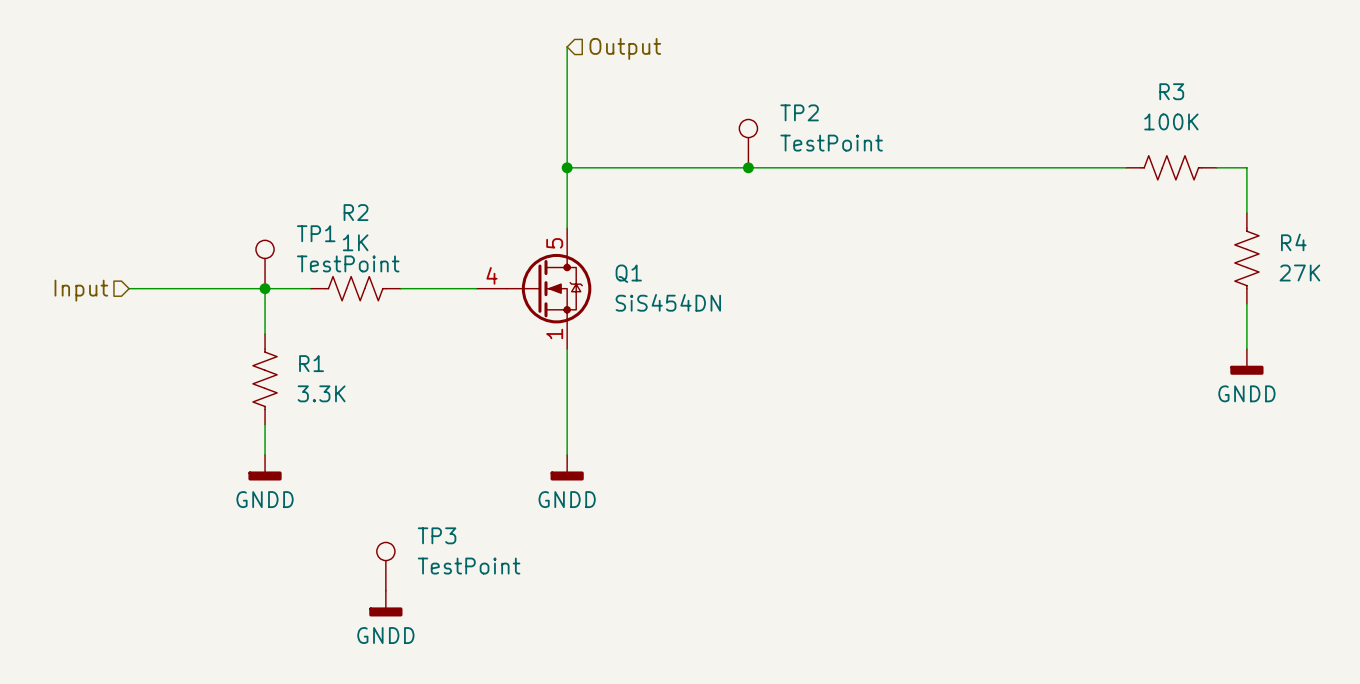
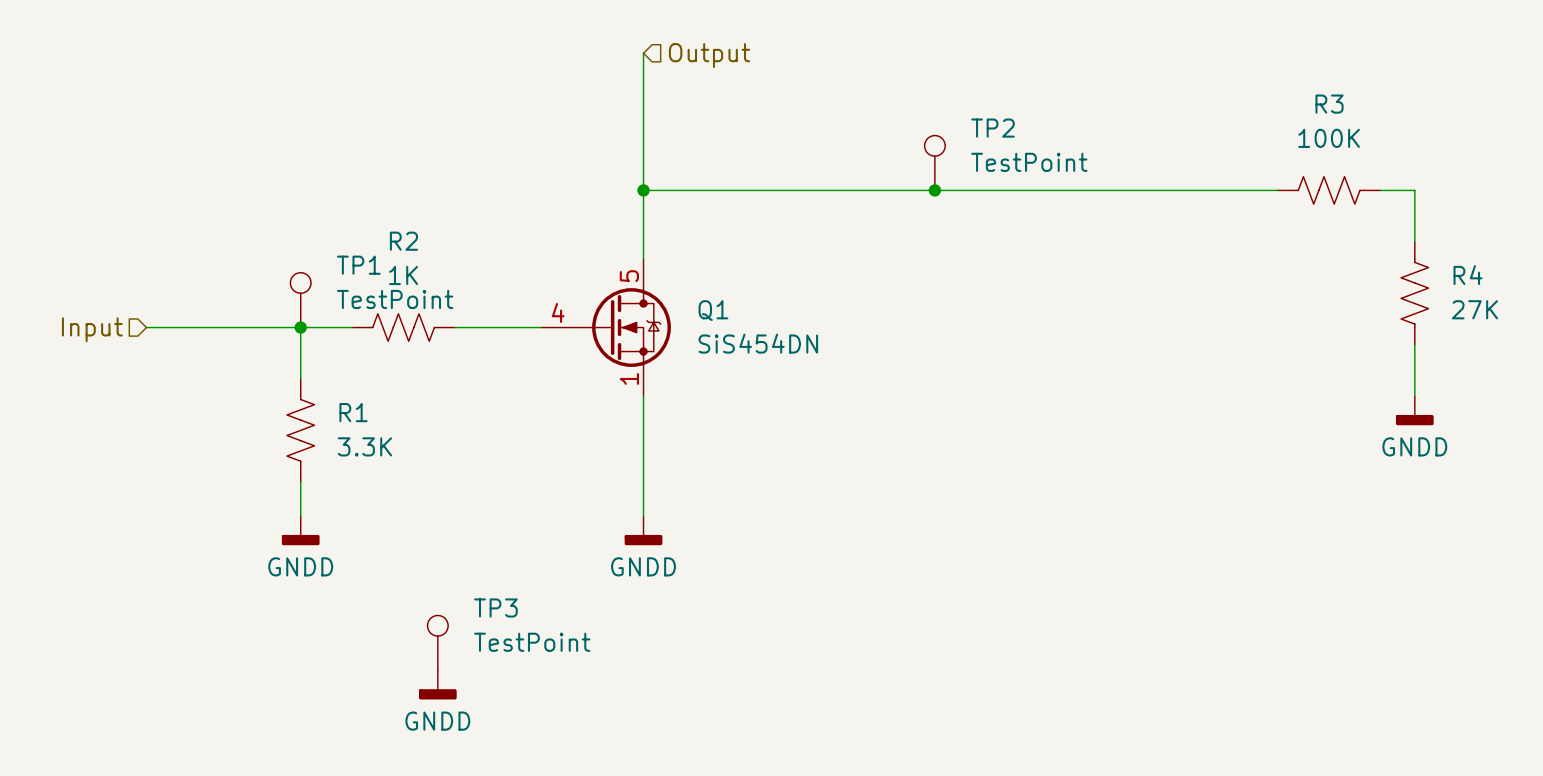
TP2 position: (748, 143) -> (934, 162)
junction: (748, 167) -> none
junction: none -> (934, 190)

